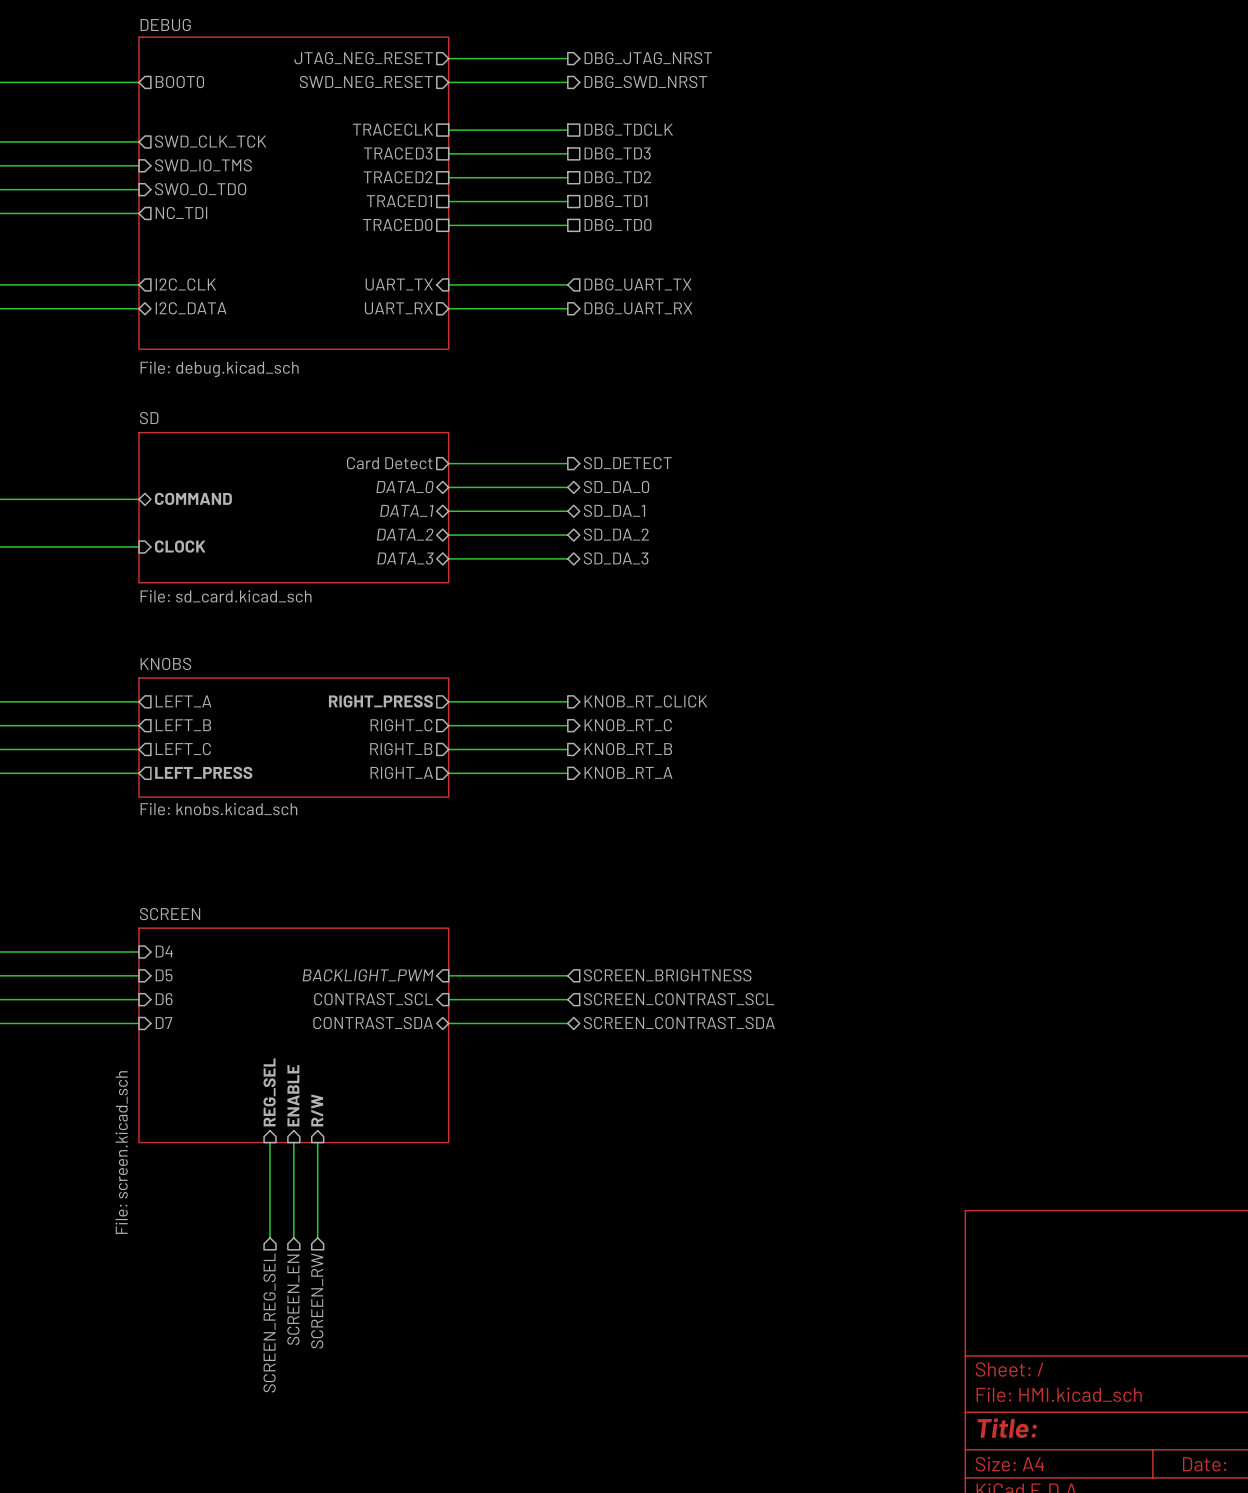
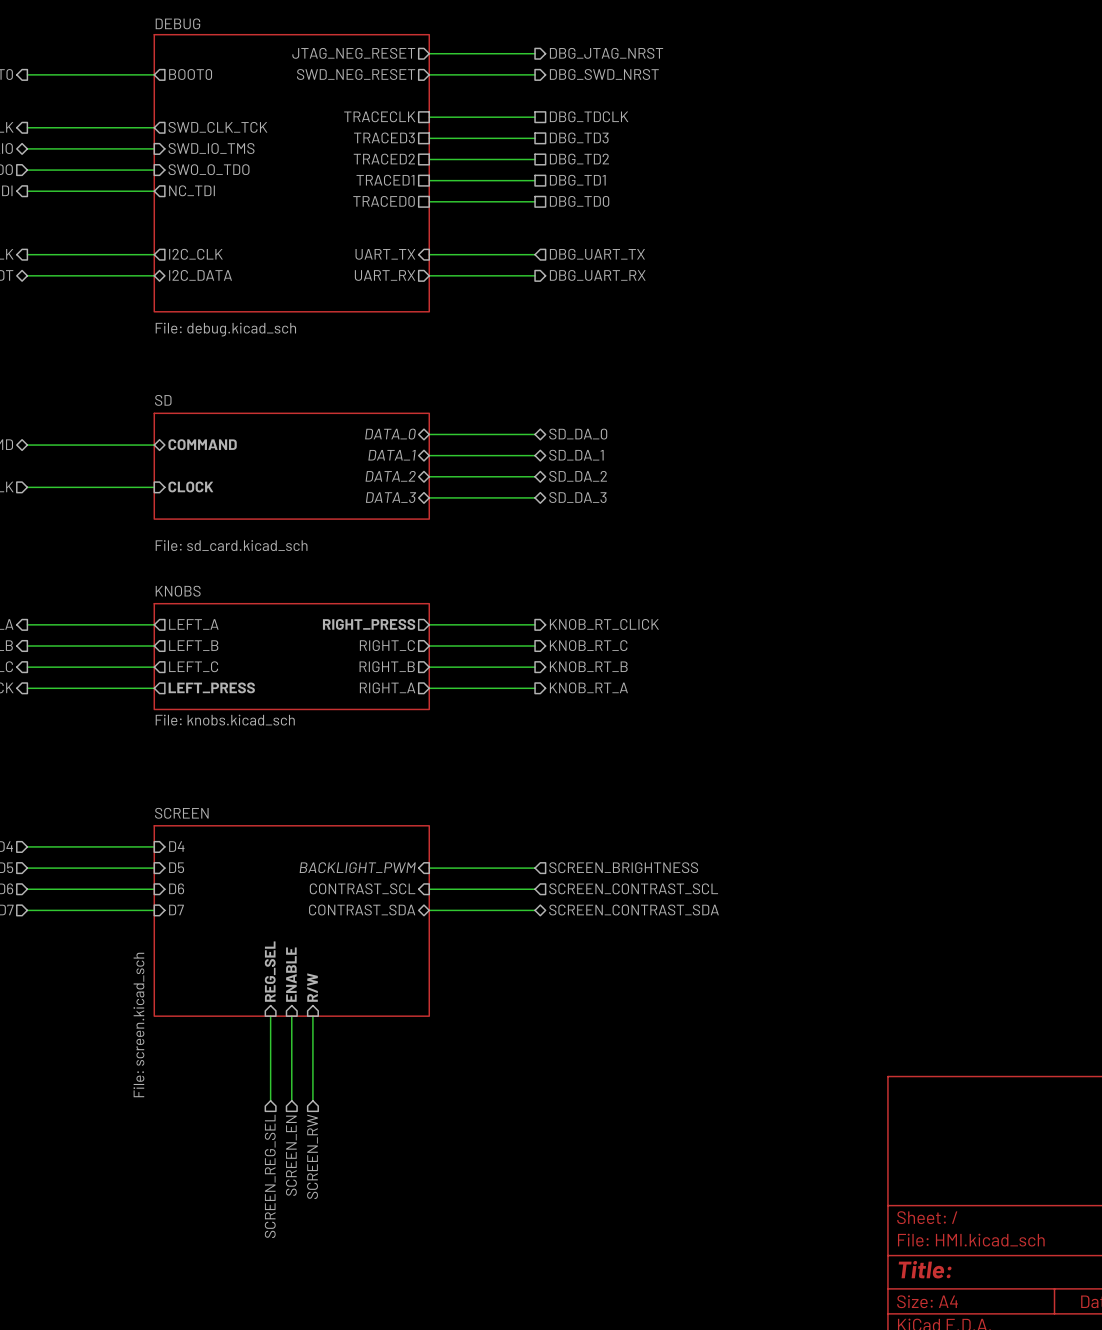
sheet pin: Card Detect (389, 463) -> none
wire: (448, 463) (567, 463) -> none
hierarchical label: SD_DETECT (627, 463) -> none
sheet SD: File: sd_card.kicad_sch (293, 507) -> none
sheet SD: none -> File: sd_card.kicad_sch (291, 466)

